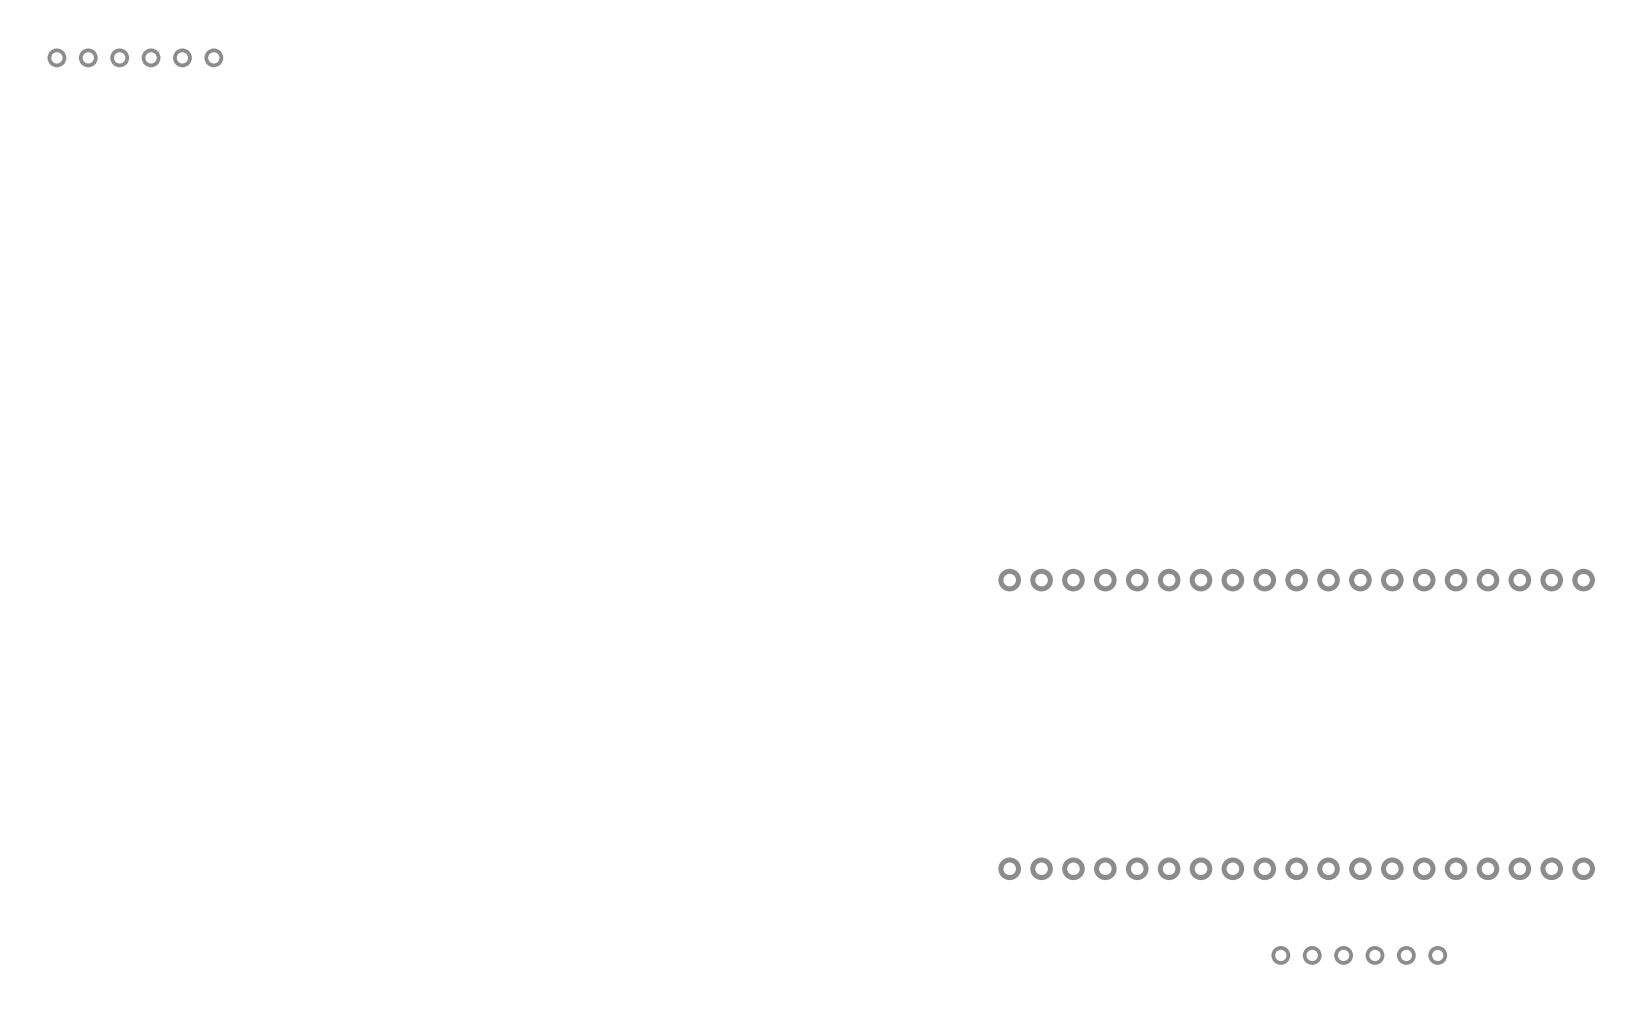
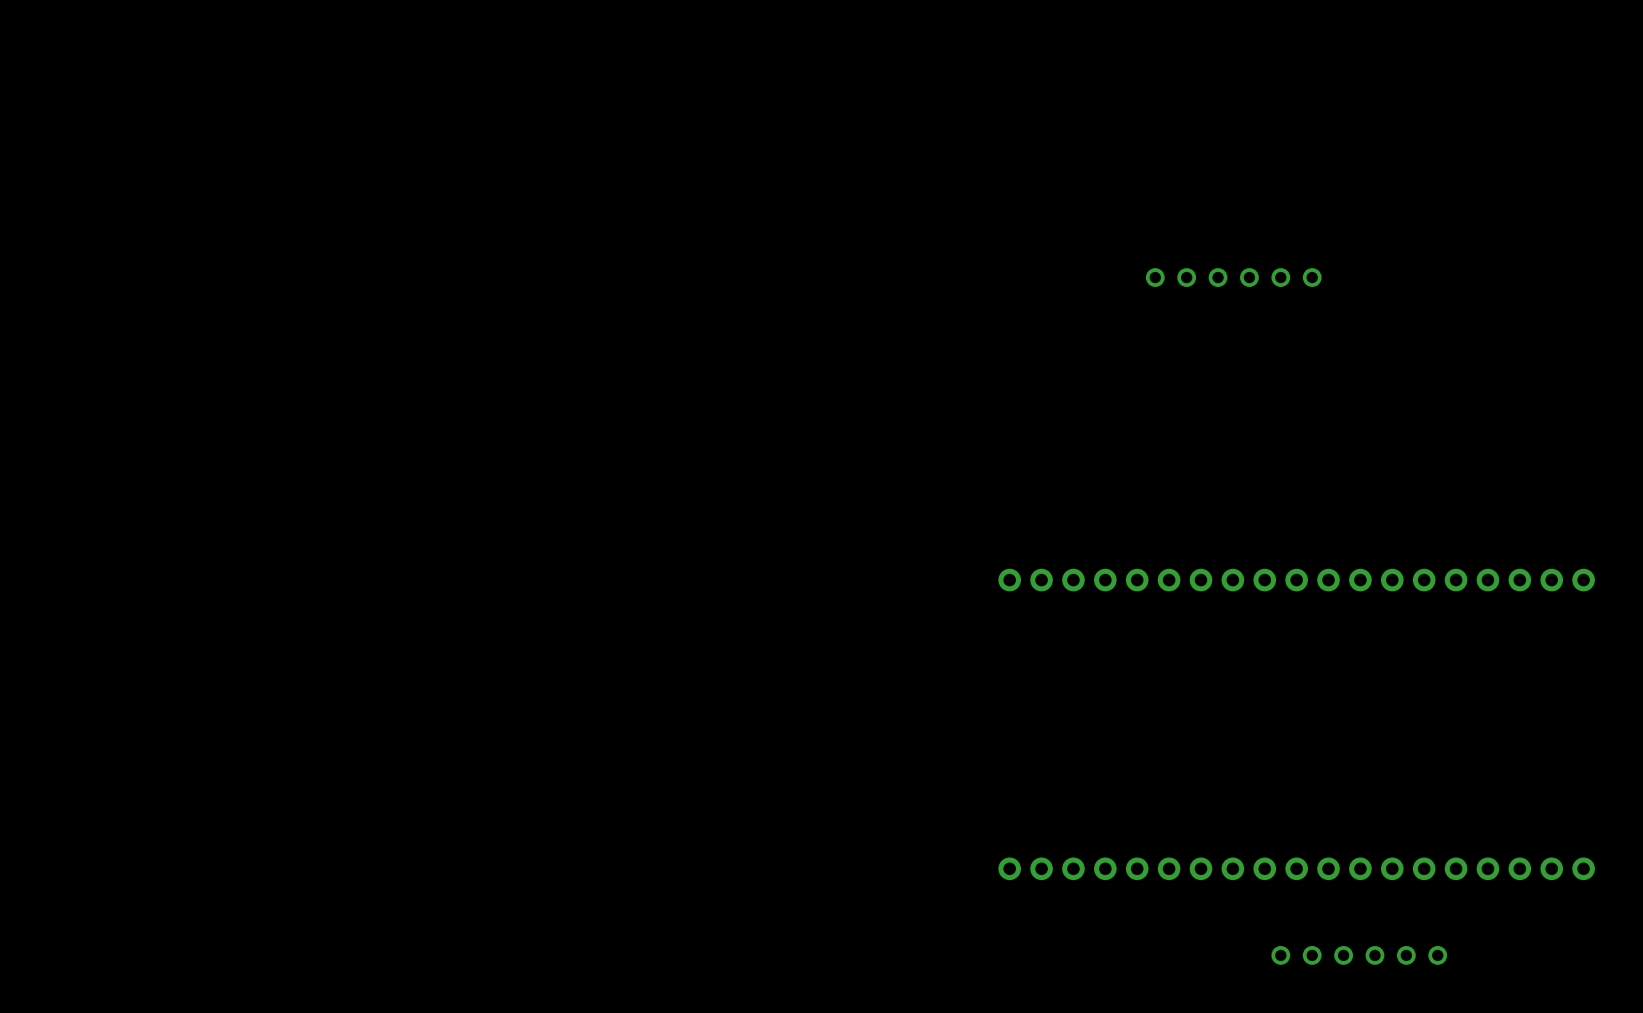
part: (135, 57) -> none
part: none -> (1233, 277)

